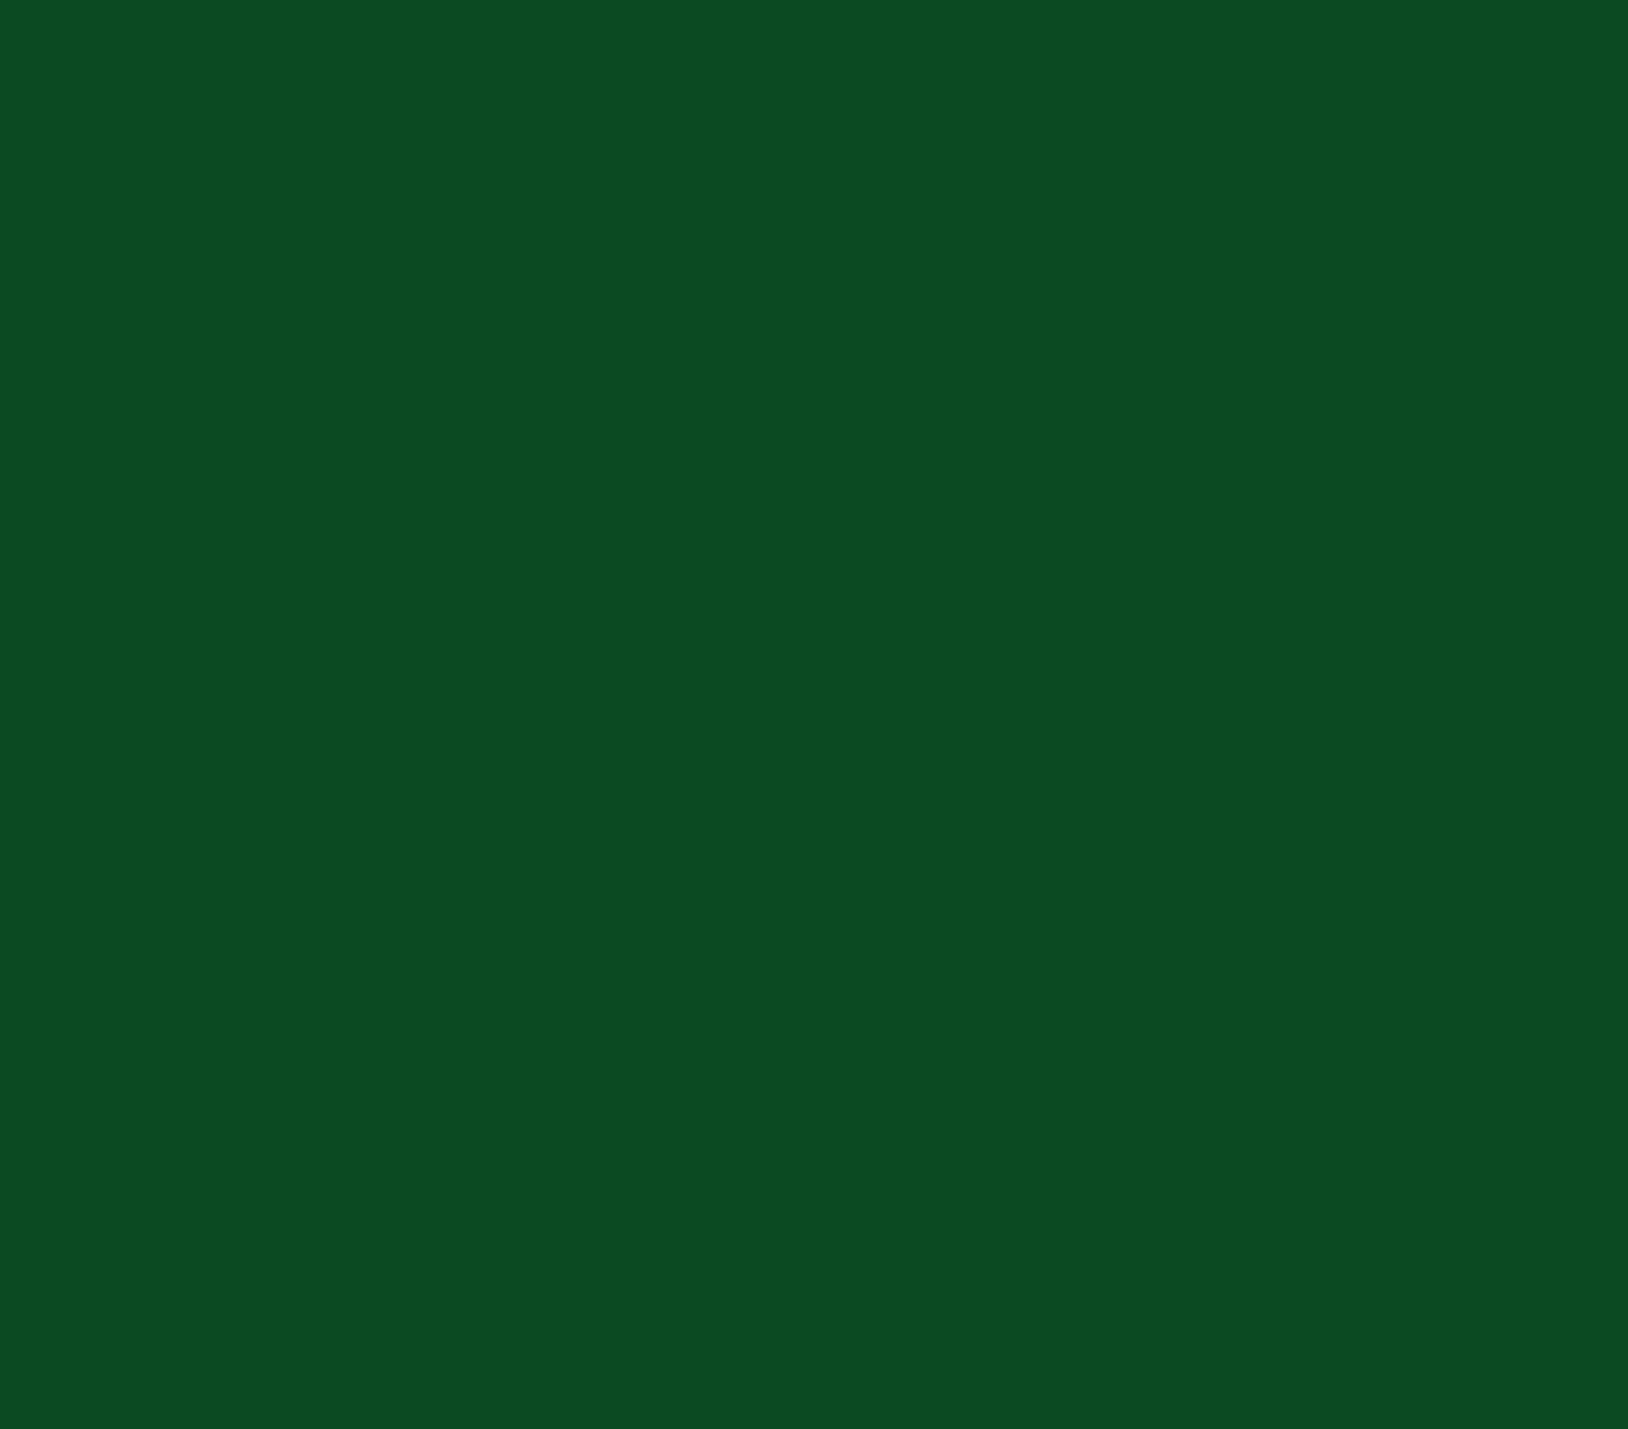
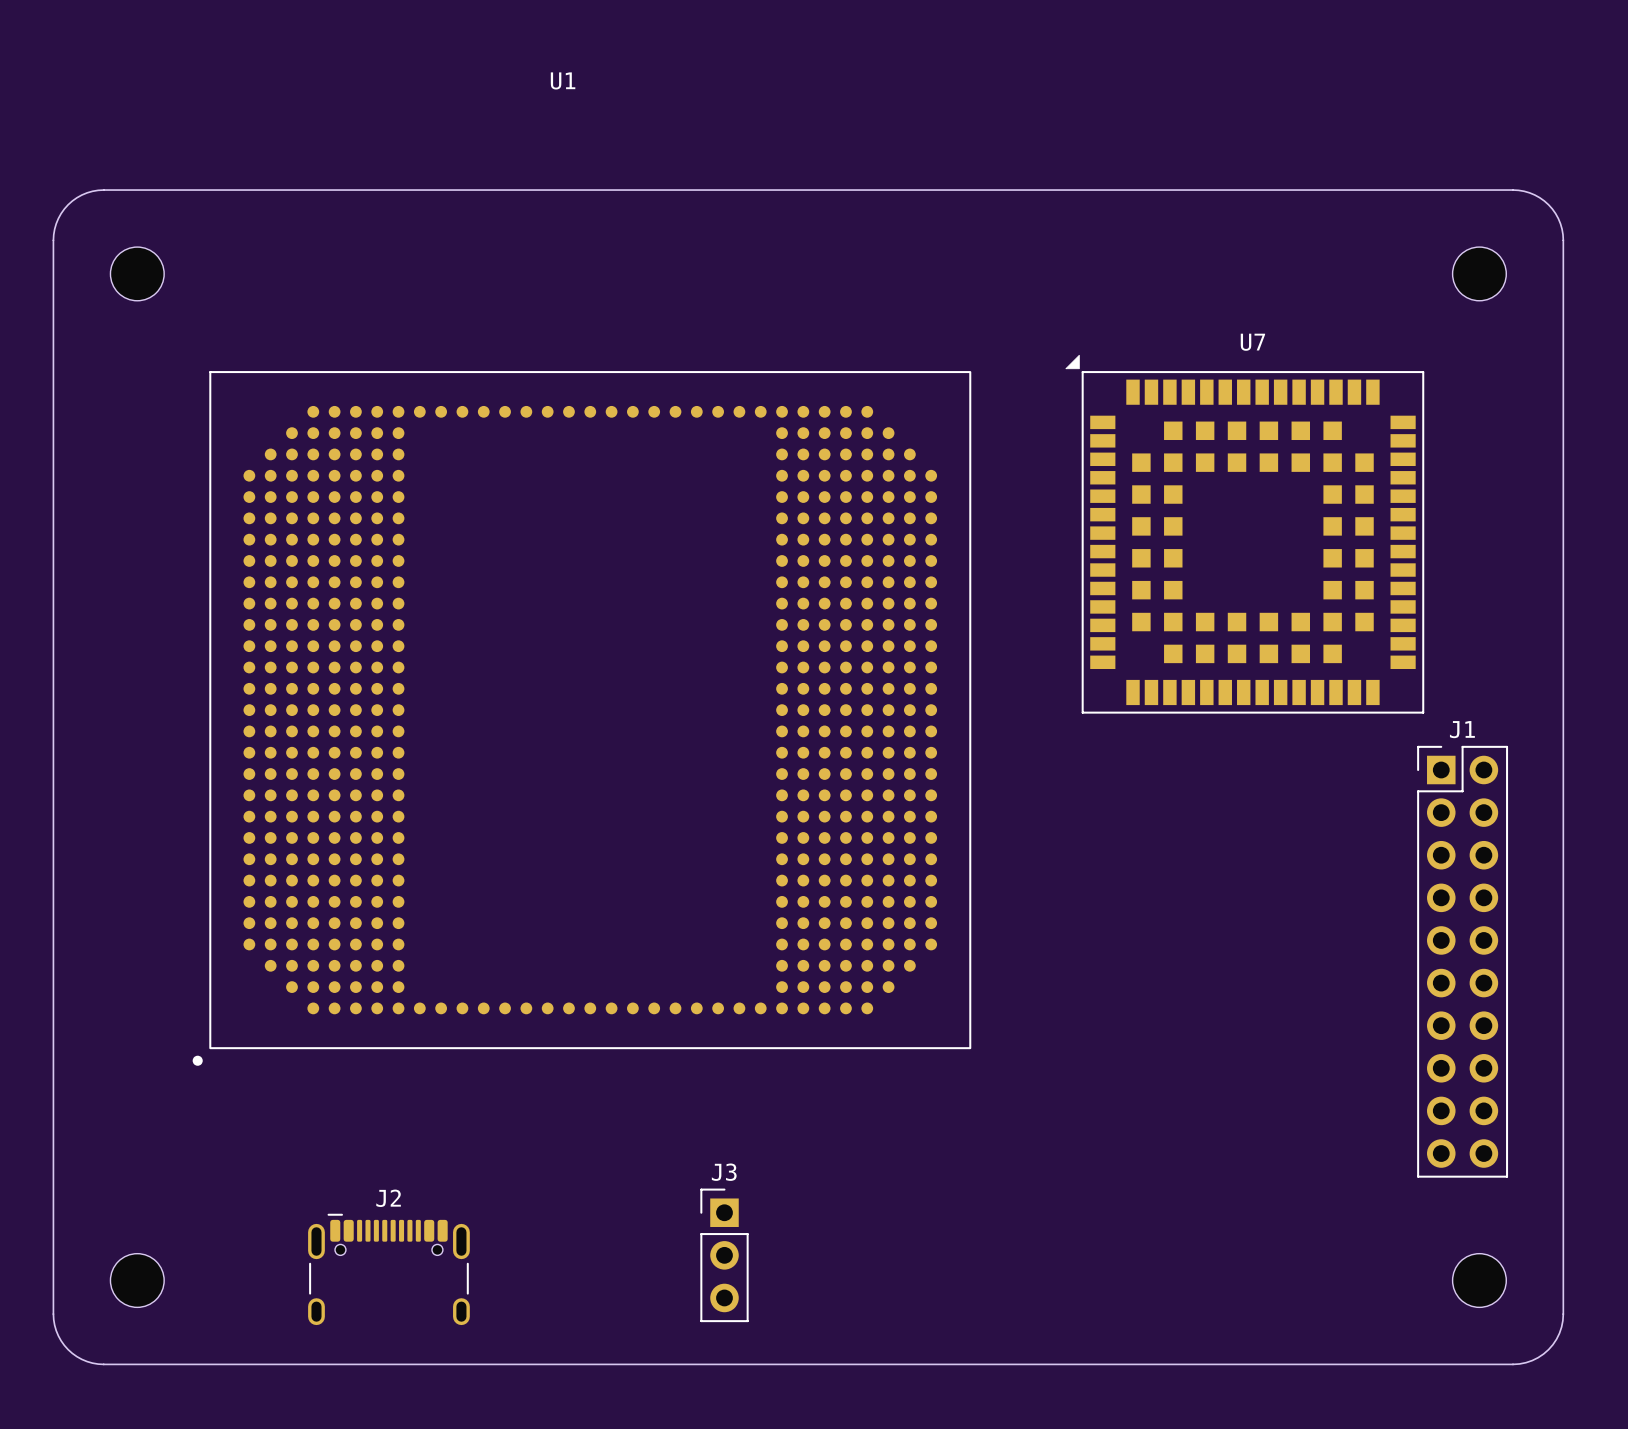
board edge: none -> (103, 190) (1512, 190) (1529, 192) (1544, 201) (1558, 218) (1563, 240) (1563, 1314) (1561, 1327) (1552, 1344) (1543, 1354) (1532, 1360) (1512, 1364) (103, 1364) (87, 1361) (72, 1353) (58, 1335) (53, 1314) (53, 240) (58, 218) (68, 204) (81, 195) (103, 190)
part: none -> (137, 273)
part: none -> (1479, 273)
U7: none -> (1244, 534)
U1: none -> (581, 718)
J1: none -> (1462, 961)
J3: none -> (724, 1255)
J2: none -> (388, 1269)
part: none -> (137, 1280)
part: none -> (1479, 1280)

